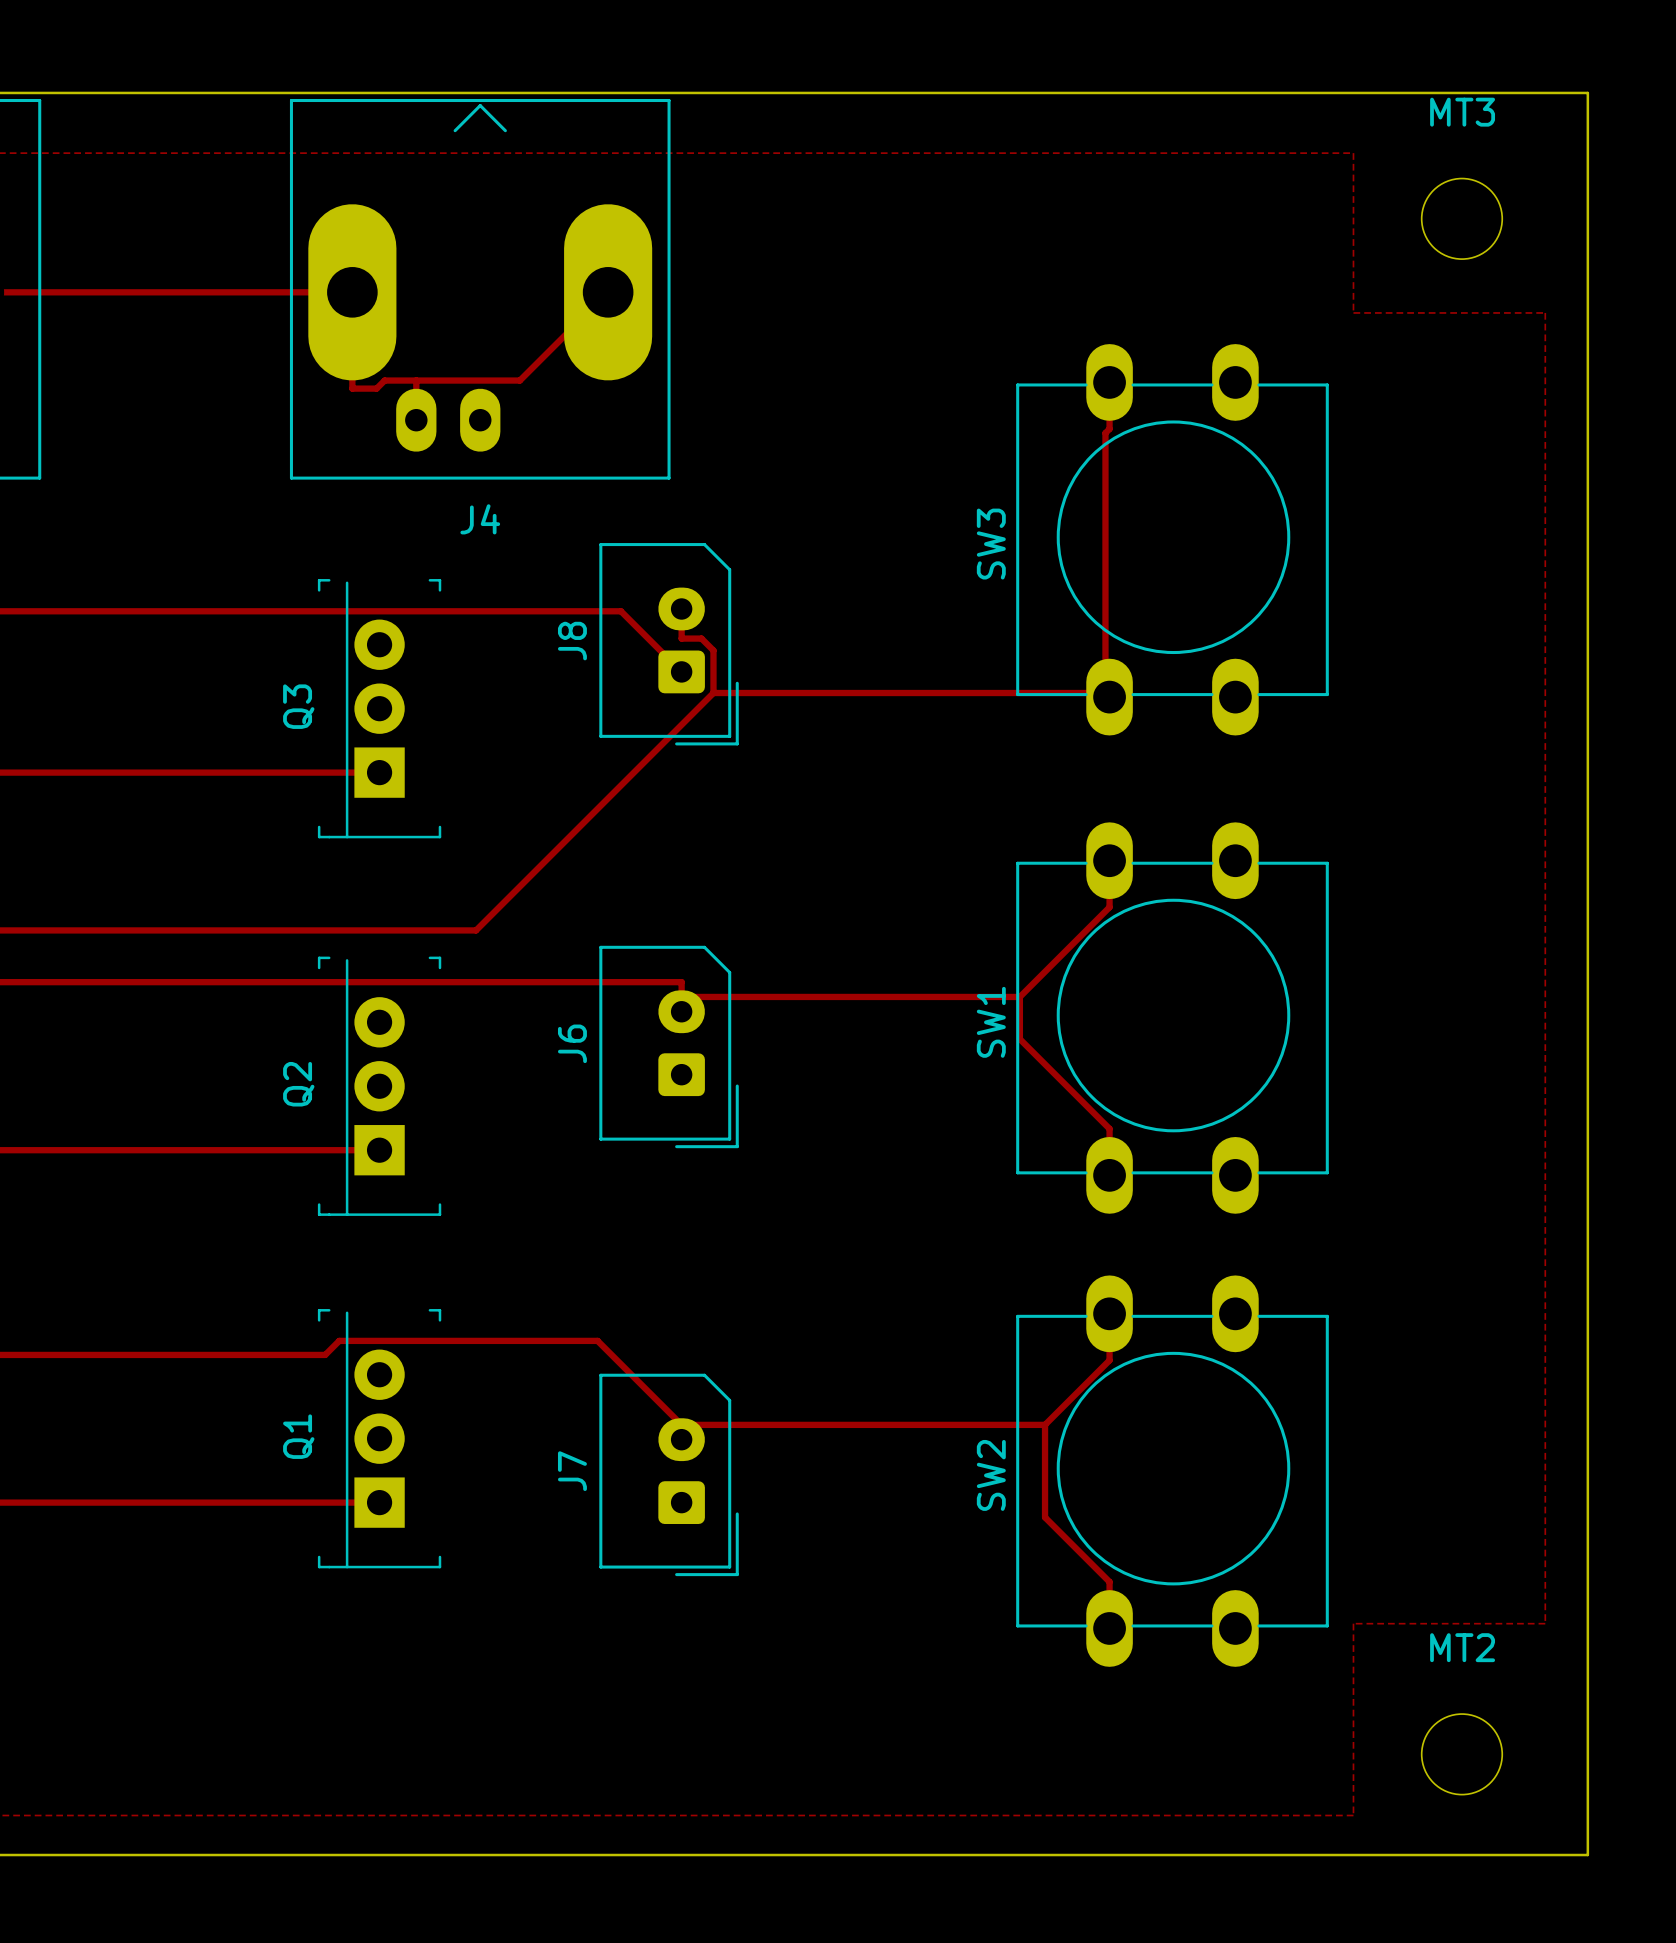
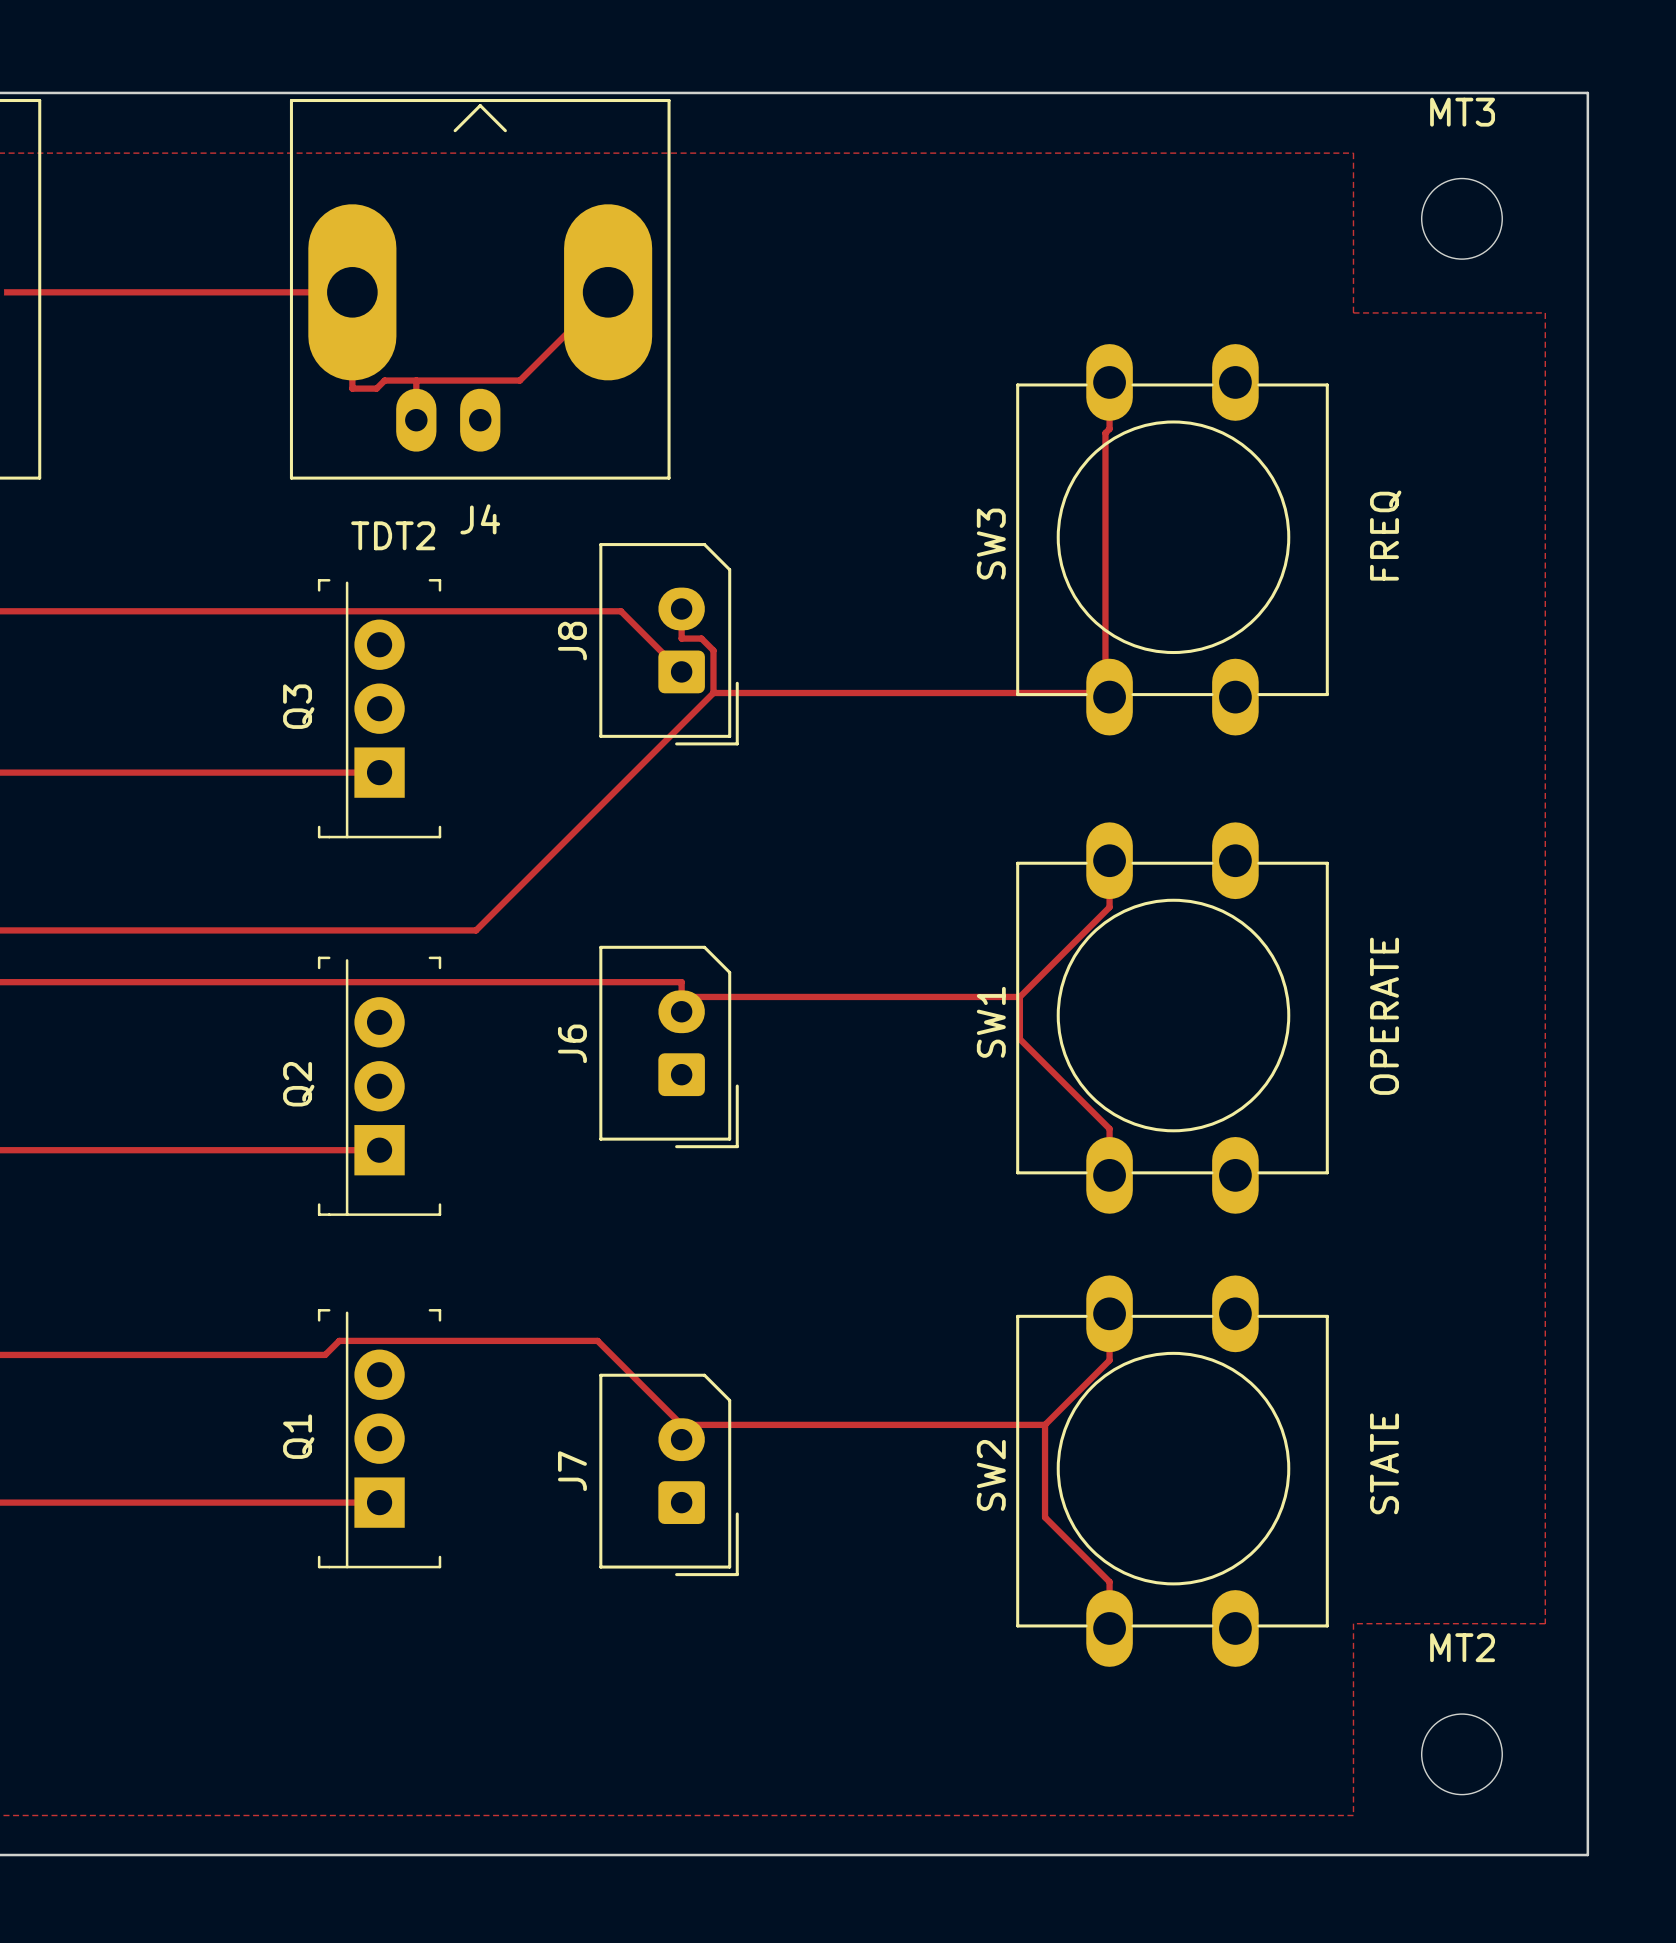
text: none -> TDT2 (393, 535)
text: none -> FREQ (1385, 535)
text: none -> OPERATE (1384, 1016)
text: none -> STATE (1384, 1463)

